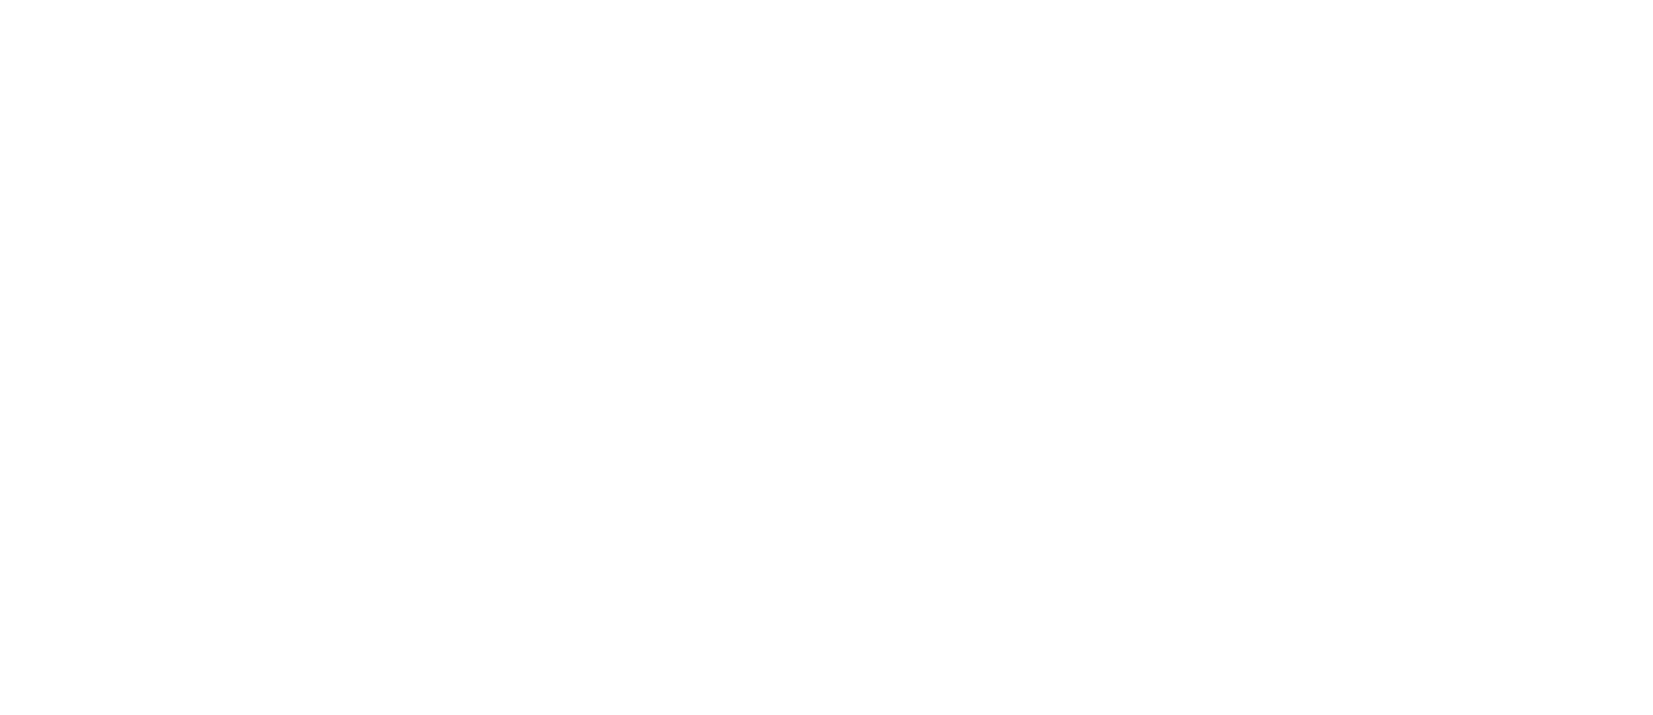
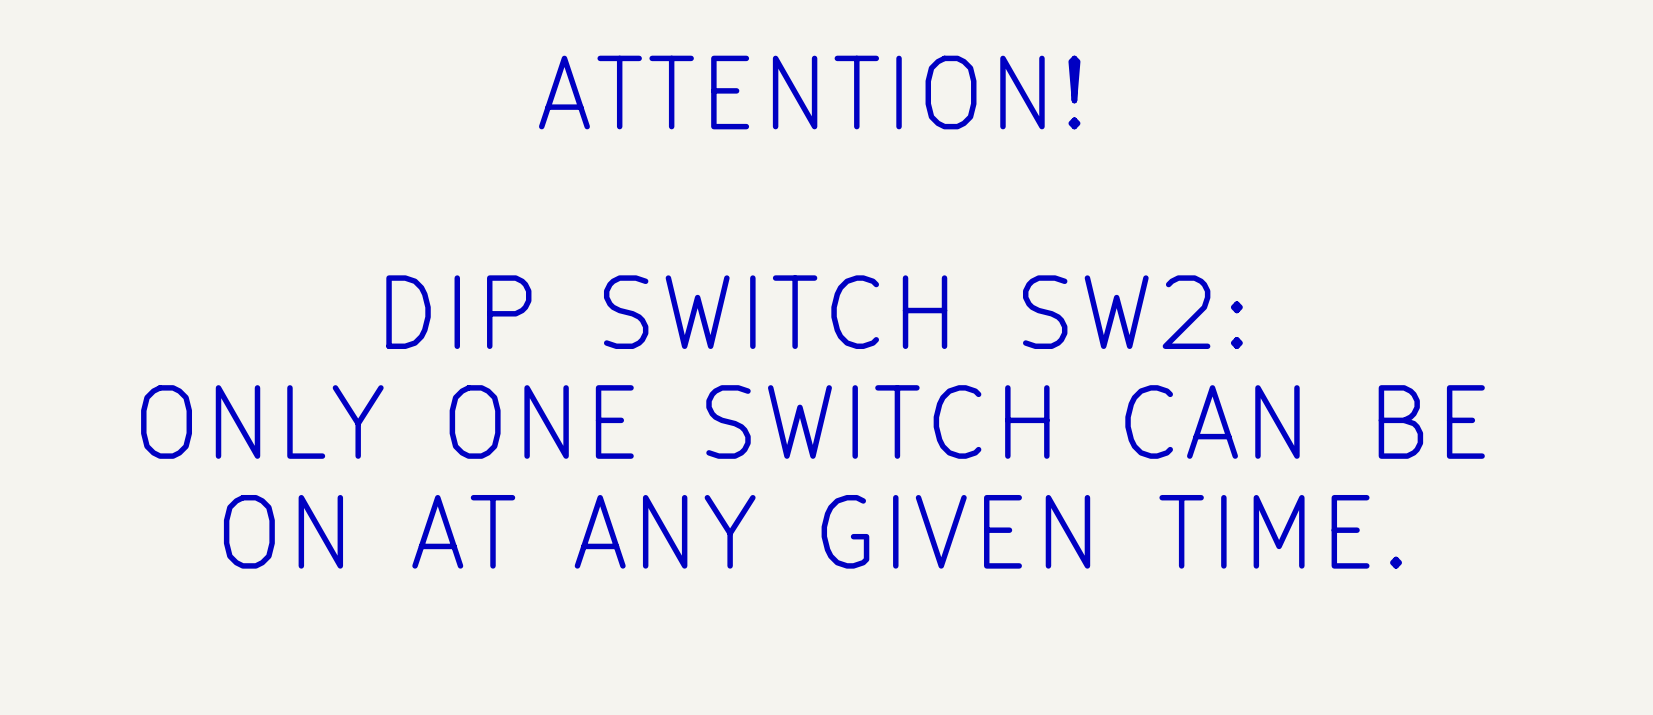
text: none -> ATTENTION! (809, 92)
text: none -> DIP SWITCH SW2: (814, 312)
text: none -> ONLY ONE SWITCH CAN BE (812, 421)
text: none -> ON AT ANY GIVEN TIME. (812, 531)

